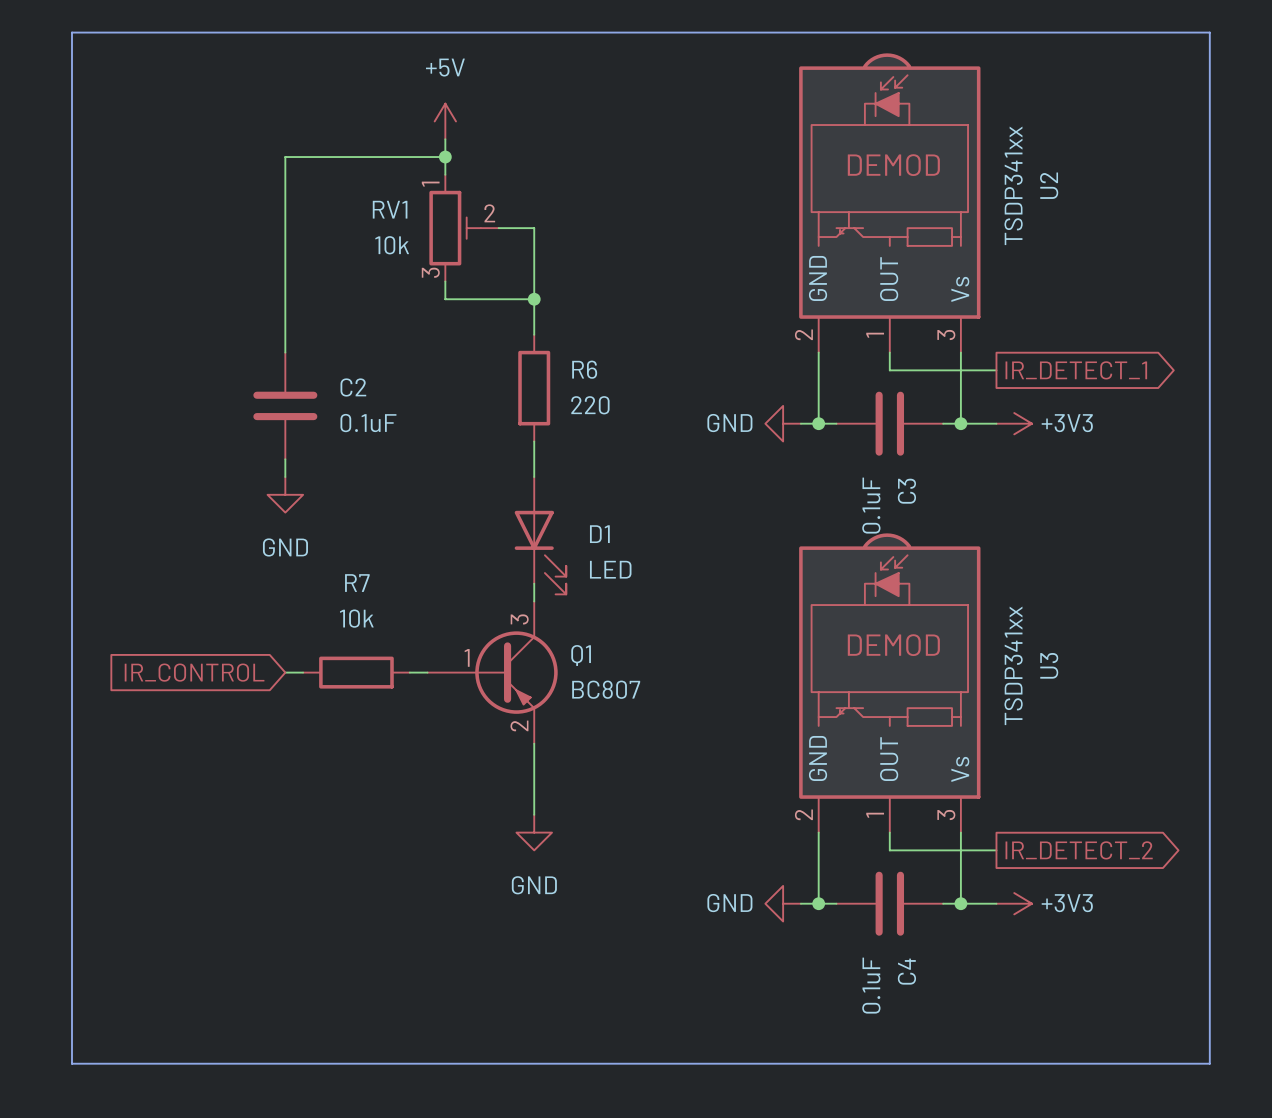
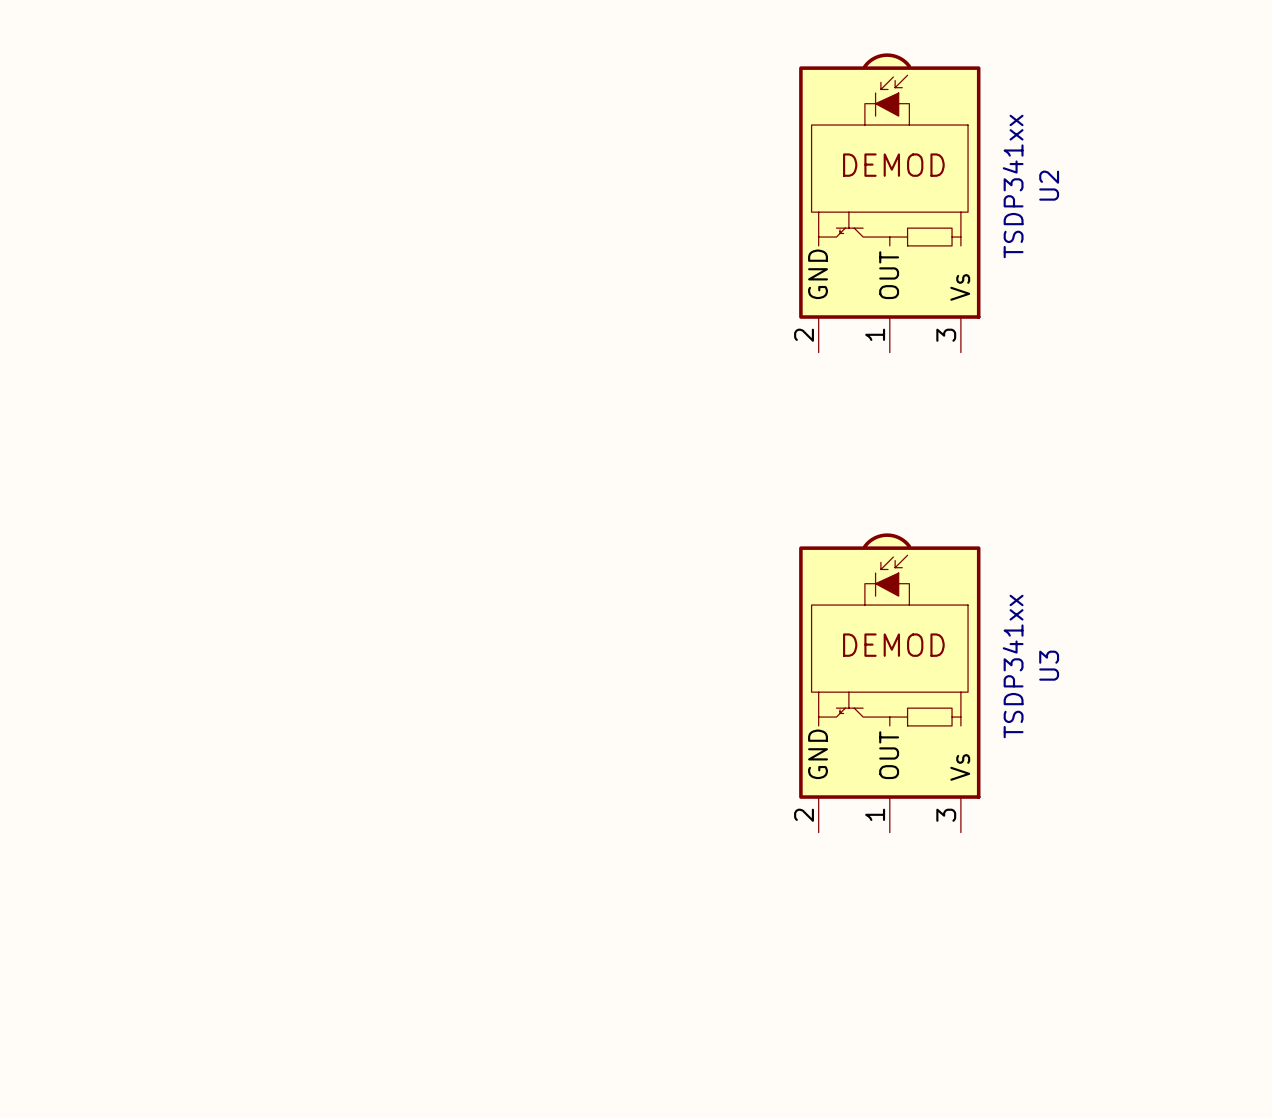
line: (71, 32) (71, 1063) (1209, 1063) (1209, 32) (71, 32) -> none
power symbol: +5V (445, 121) -> none
wire: (445, 139) (445, 174) -> none
wire: (445, 157) (285, 157) (285, 352) -> none
junction: (445, 157) -> none
RV1: 10k (464, 228) -> none
wire: (498, 228) (534, 228) (534, 334) -> none
wire: (445, 281) (445, 299) (534, 299) -> none
junction: (534, 299) -> none
wire: (818, 352) (818, 423) -> none
wire: (889, 352) (889, 370) (996, 370) -> none
wire: (960, 352) (960, 423) -> none
global label: IR_DETECT_1 (1076, 370) -> none
R6: 220 (534, 388) -> none
C2: 0.1uF (285, 405) -> none
power symbol: GND (783, 423) -> none
wire: (800, 423) (836, 423) -> none
junction: (818, 423) -> none
C3: 0.1uF (889, 423) -> none
wire: (943, 423) (996, 423) -> none
junction: (960, 423) -> none
power symbol: +3V3 (1014, 423) -> none
wire: (534, 441) (534, 477) -> none
wire: (285, 459) (285, 477) -> none
power symbol: GND (285, 494) -> none
D1: LED (540, 535) -> none
wire: (534, 583) (534, 601) -> none
global label: IR_CONTROL (194, 672) -> none
wire: (285, 672) (303, 672) -> none
R7: 10k (356, 672) -> none
wire: (409, 672) (427, 672) -> none
Q1: BC807 (492, 672) -> none
wire: (534, 743) (534, 814) -> none
power symbol: GND (534, 832) -> none
wire: (818, 832) (818, 903) -> none
wire: (889, 832) (889, 850) (996, 850) -> none
wire: (960, 832) (960, 903) -> none
global label: IR_DETECT_2 (1079, 850) -> none
power symbol: GND (783, 903) -> none
wire: (800, 903) (836, 903) -> none
junction: (818, 903) -> none
C4: 0.1uF (889, 903) -> none
wire: (943, 903) (996, 903) -> none
junction: (960, 903) -> none
power symbol: +3V3 (1014, 903) -> none

